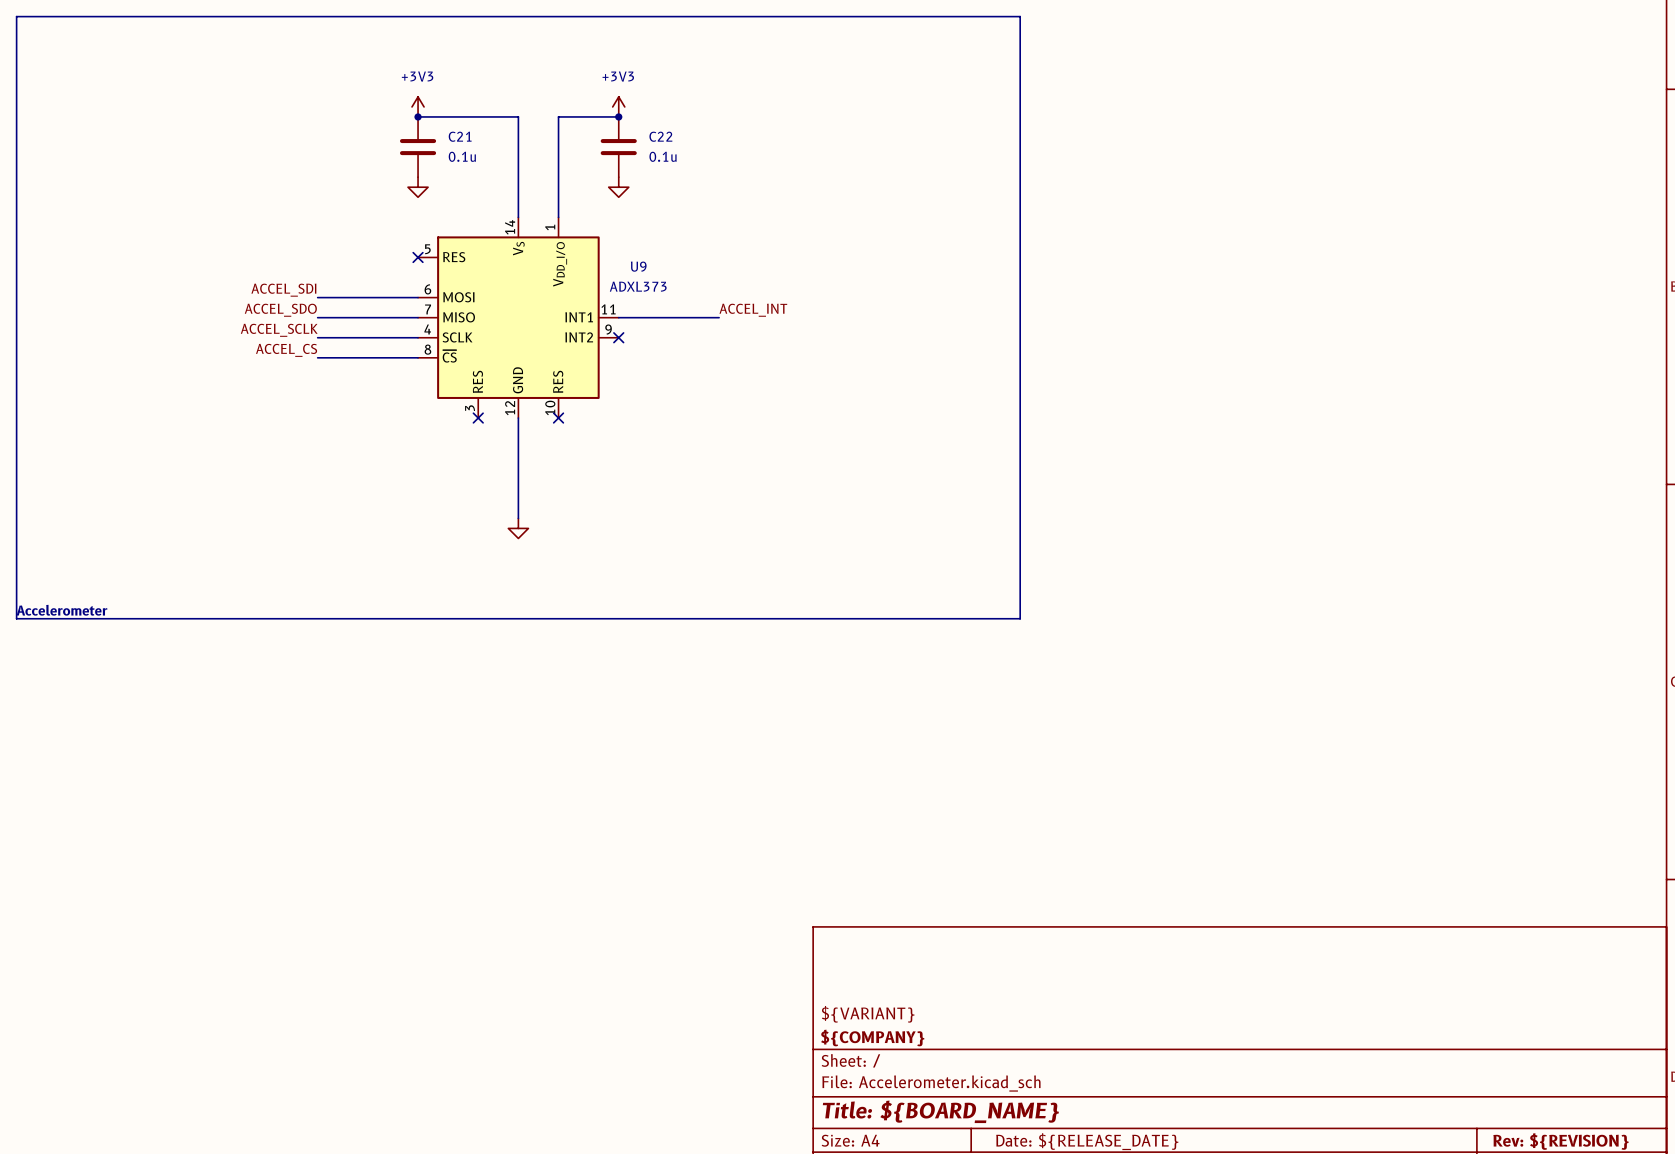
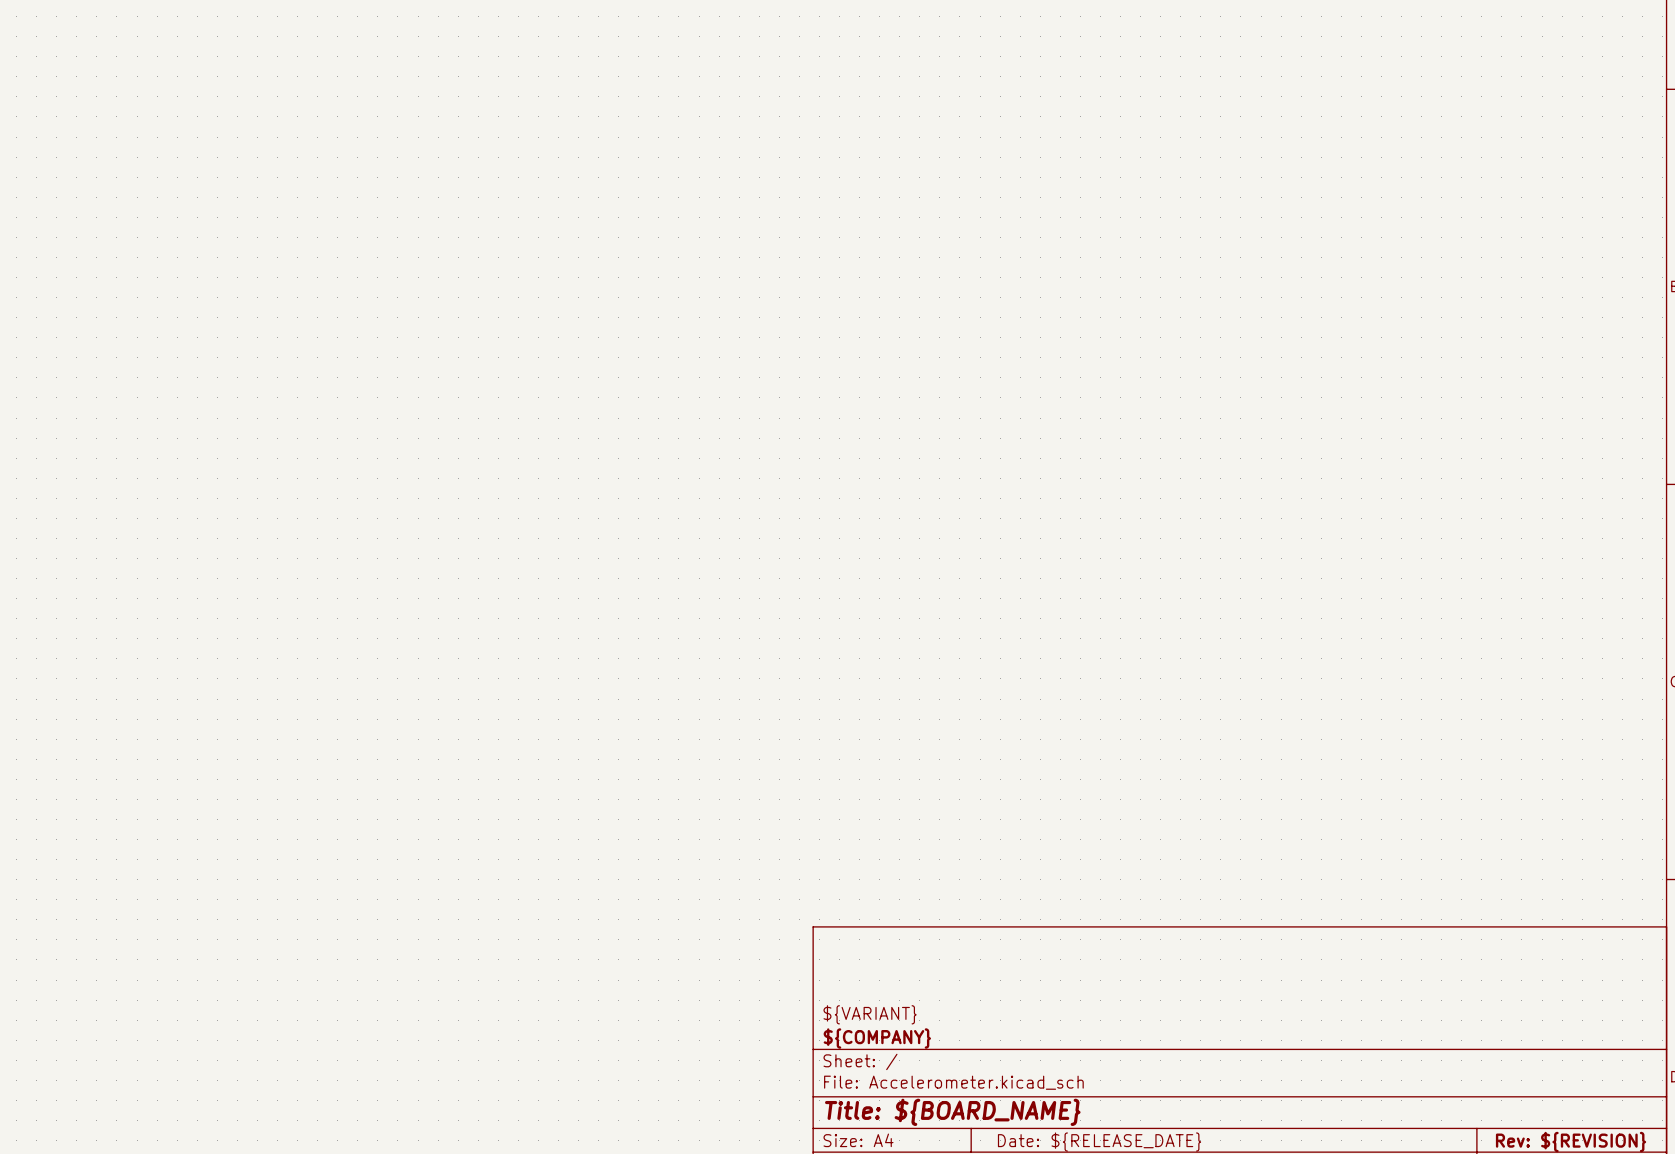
line: (16, 16) (1020, 16) (1020, 618) (16, 618) (16, 16) -> none
power symbol: +3V3 (418, 106) -> none
power symbol: +3V3 (618, 106) -> none
wire: (418, 116) (518, 116) (518, 217) -> none
junction: (418, 116) -> none
wire: (618, 116) (558, 116) (558, 217) -> none
junction: (618, 116) -> none
C21: 0.1u (418, 147) -> none
C22: 0.1u (618, 147) -> none
power symbol: (418, 187) -> none
power symbol: (618, 187) -> none
no-connect mark: (418, 257) -> none
label: ACCEL_SDI (283, 290) -> none
wire: (317, 297) (418, 297) -> none
label: ACCEL_SDO (280, 310) -> none
label: ACCEL_INT (753, 310) -> none
wire: (317, 317) (418, 317) -> none
U9: ADXL373 (518, 317) -> none
wire: (618, 317) (719, 317) -> none
label: ACCEL_SCLK (279, 330) -> none
wire: (317, 337) (418, 337) -> none
no-connect mark: (618, 337) -> none
label: ACCEL_CS (286, 350) -> none
wire: (317, 357) (418, 357) -> none
no-connect mark: (478, 418) -> none
wire: (518, 418) (518, 518) -> none
no-connect mark: (558, 418) -> none
power symbol: (518, 528) -> none
text: Accelerometer (61, 610) -> none

